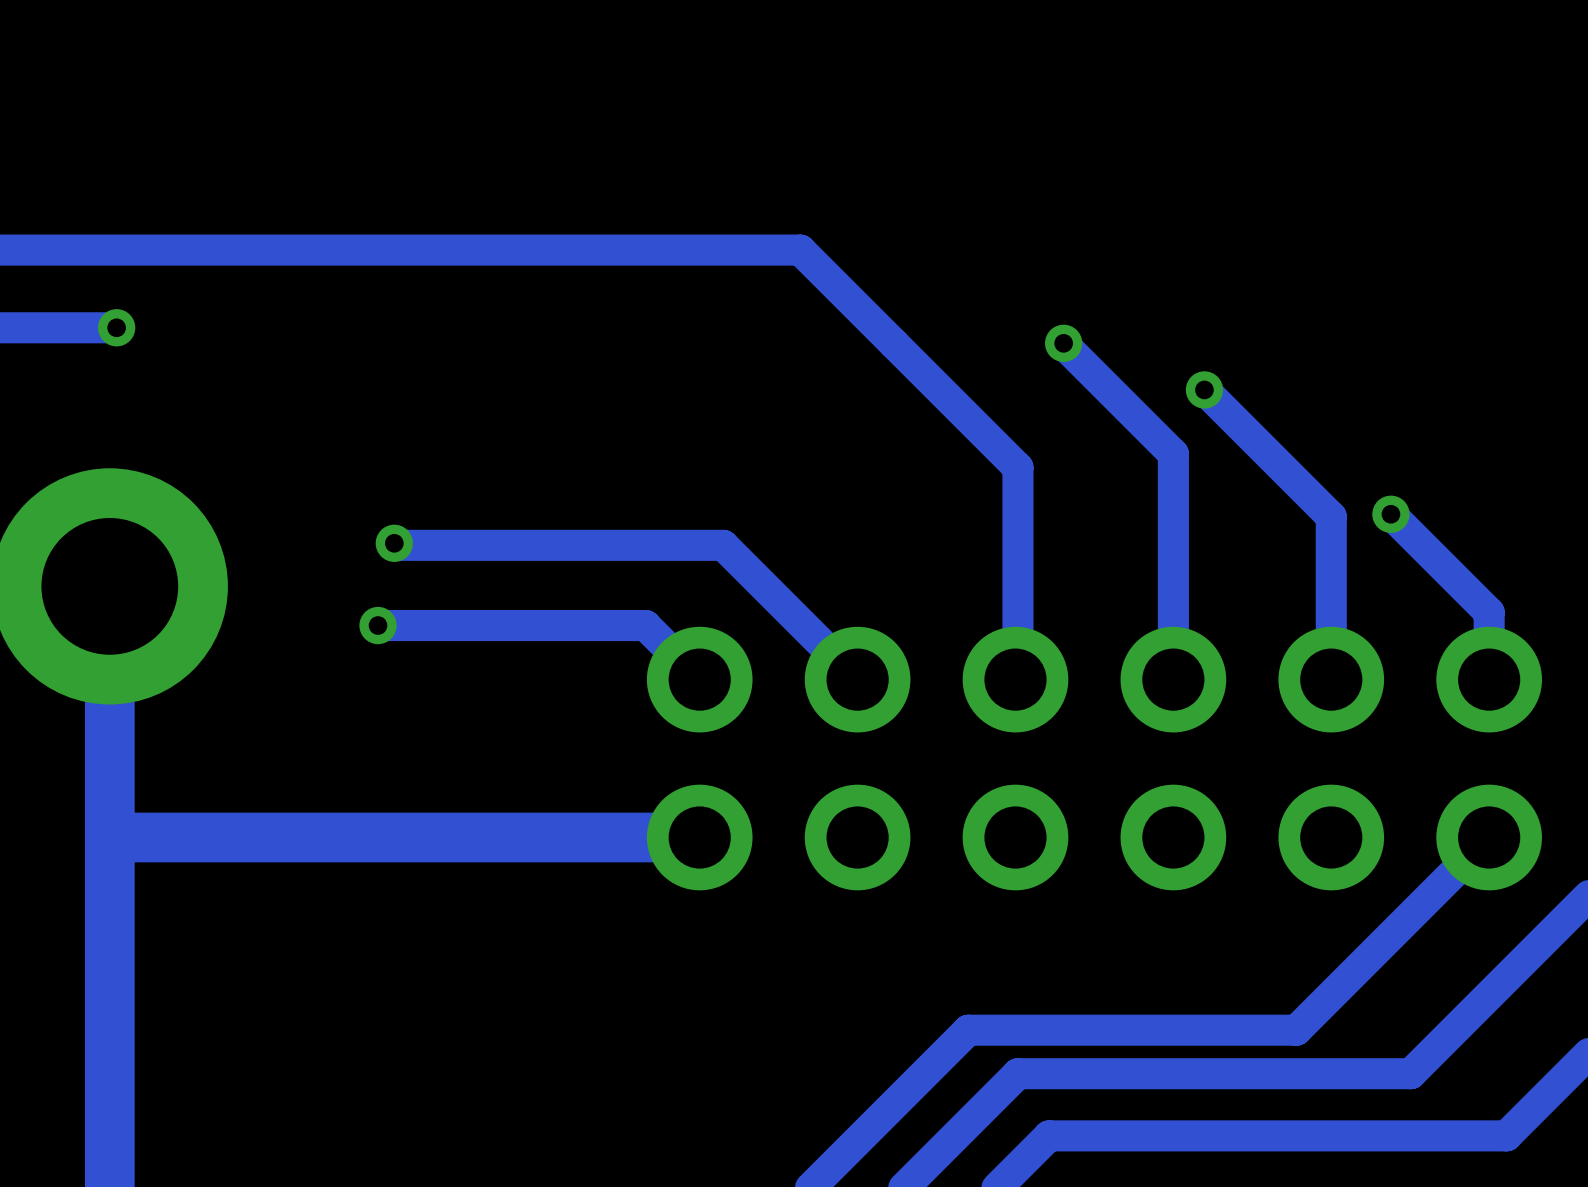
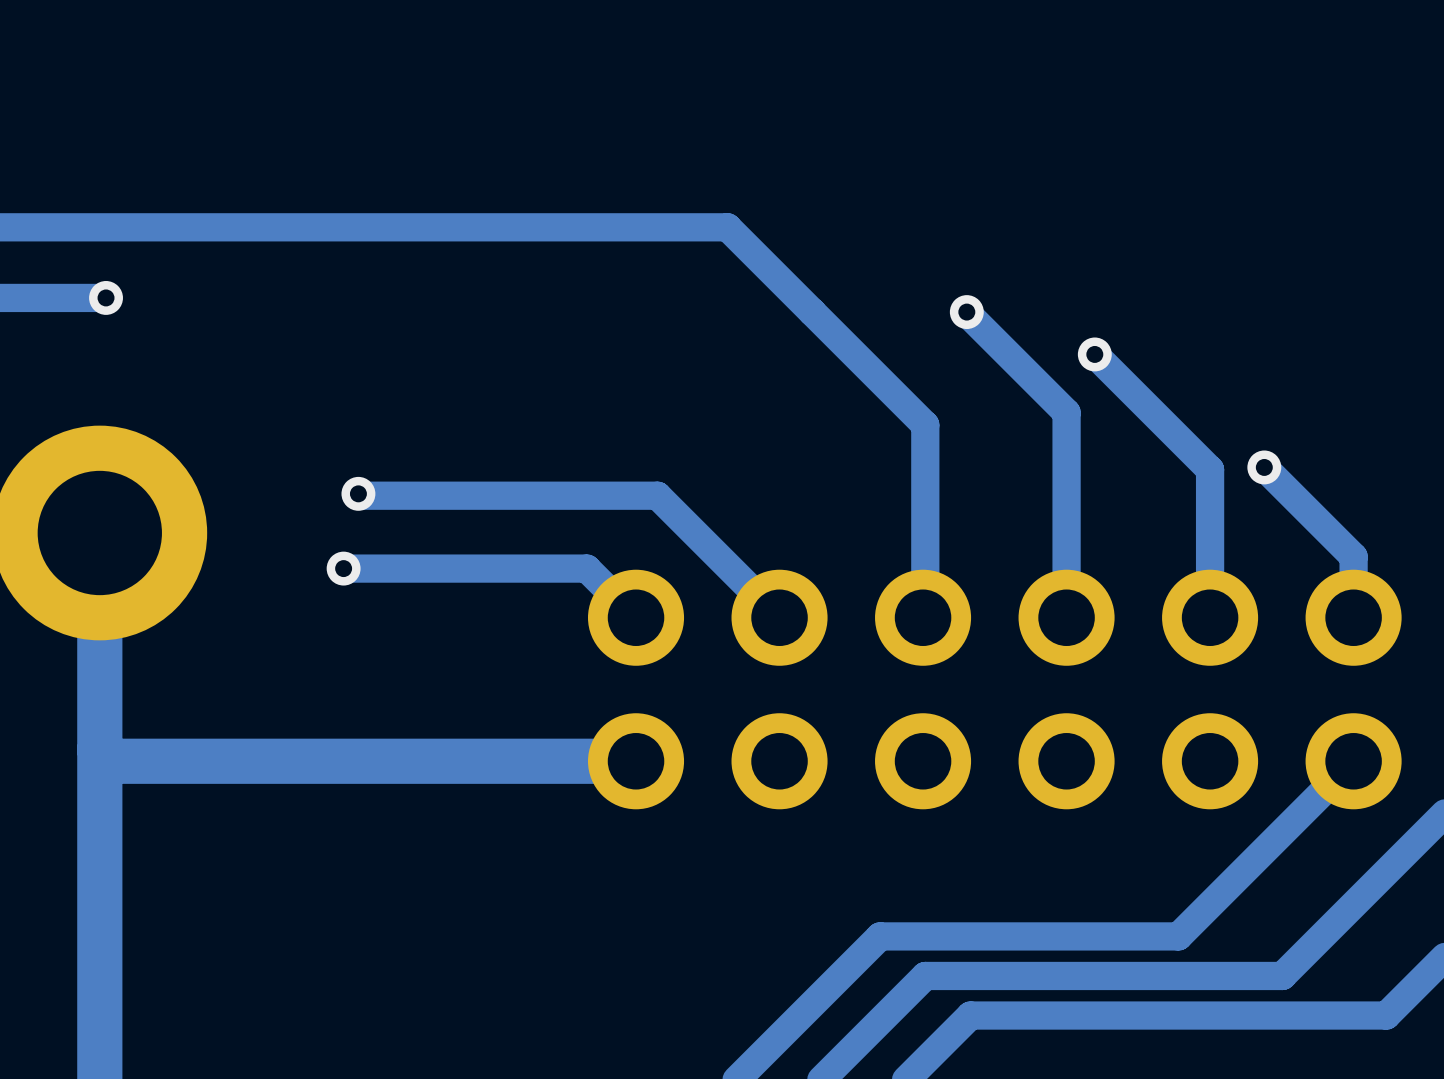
track: (1525, 1117) (1506, 1135) (1049, 1135) -> (1386, 1015) (970, 1015) (953, 1032)

